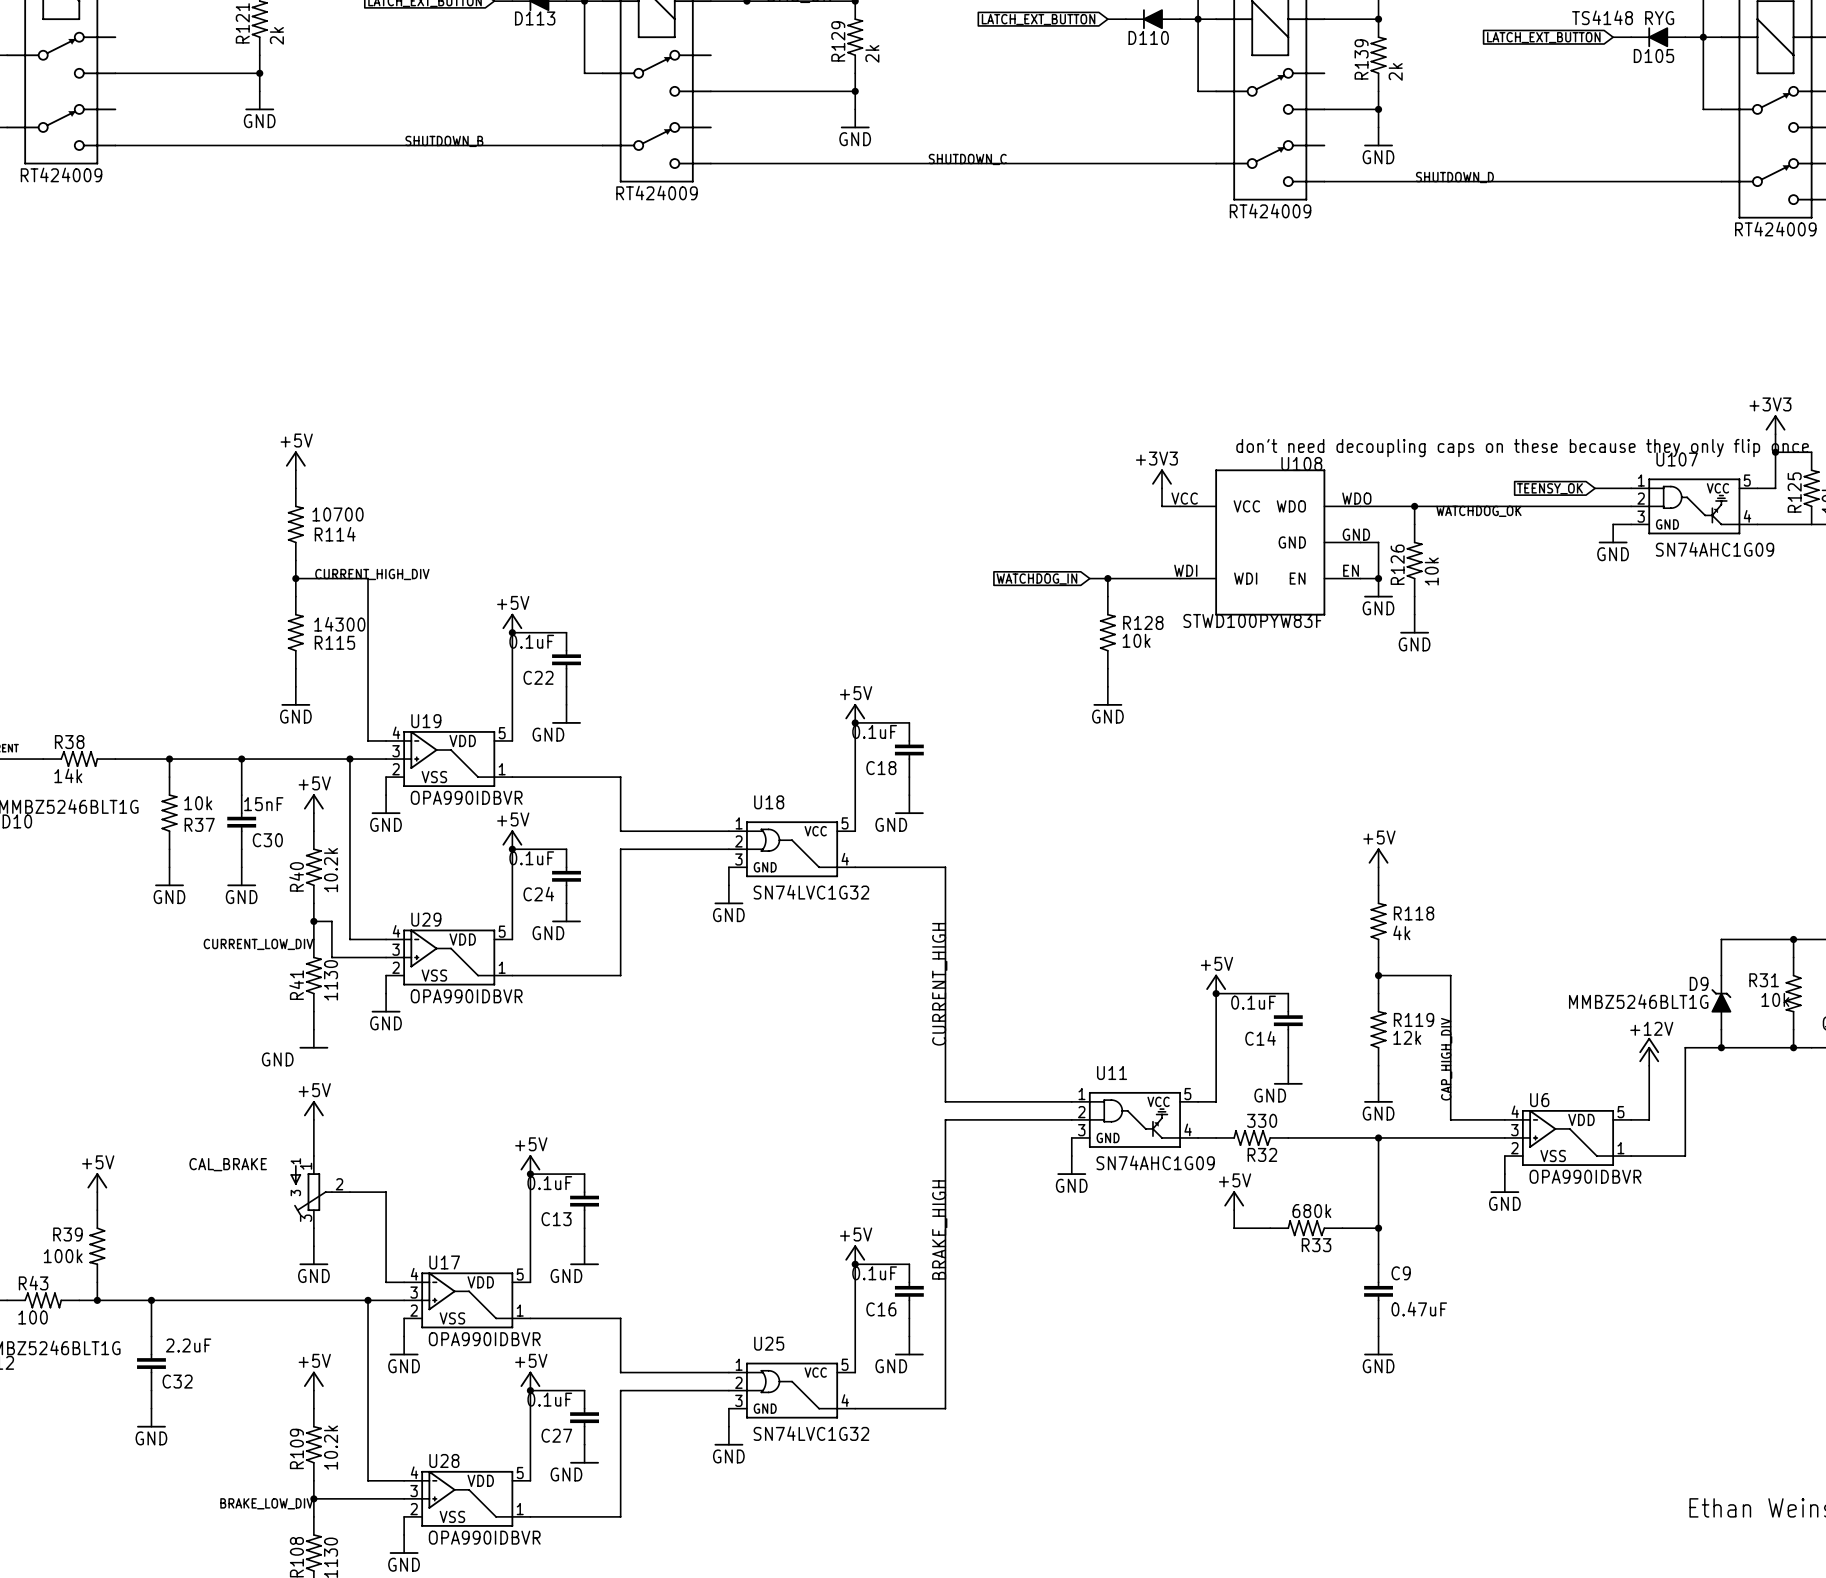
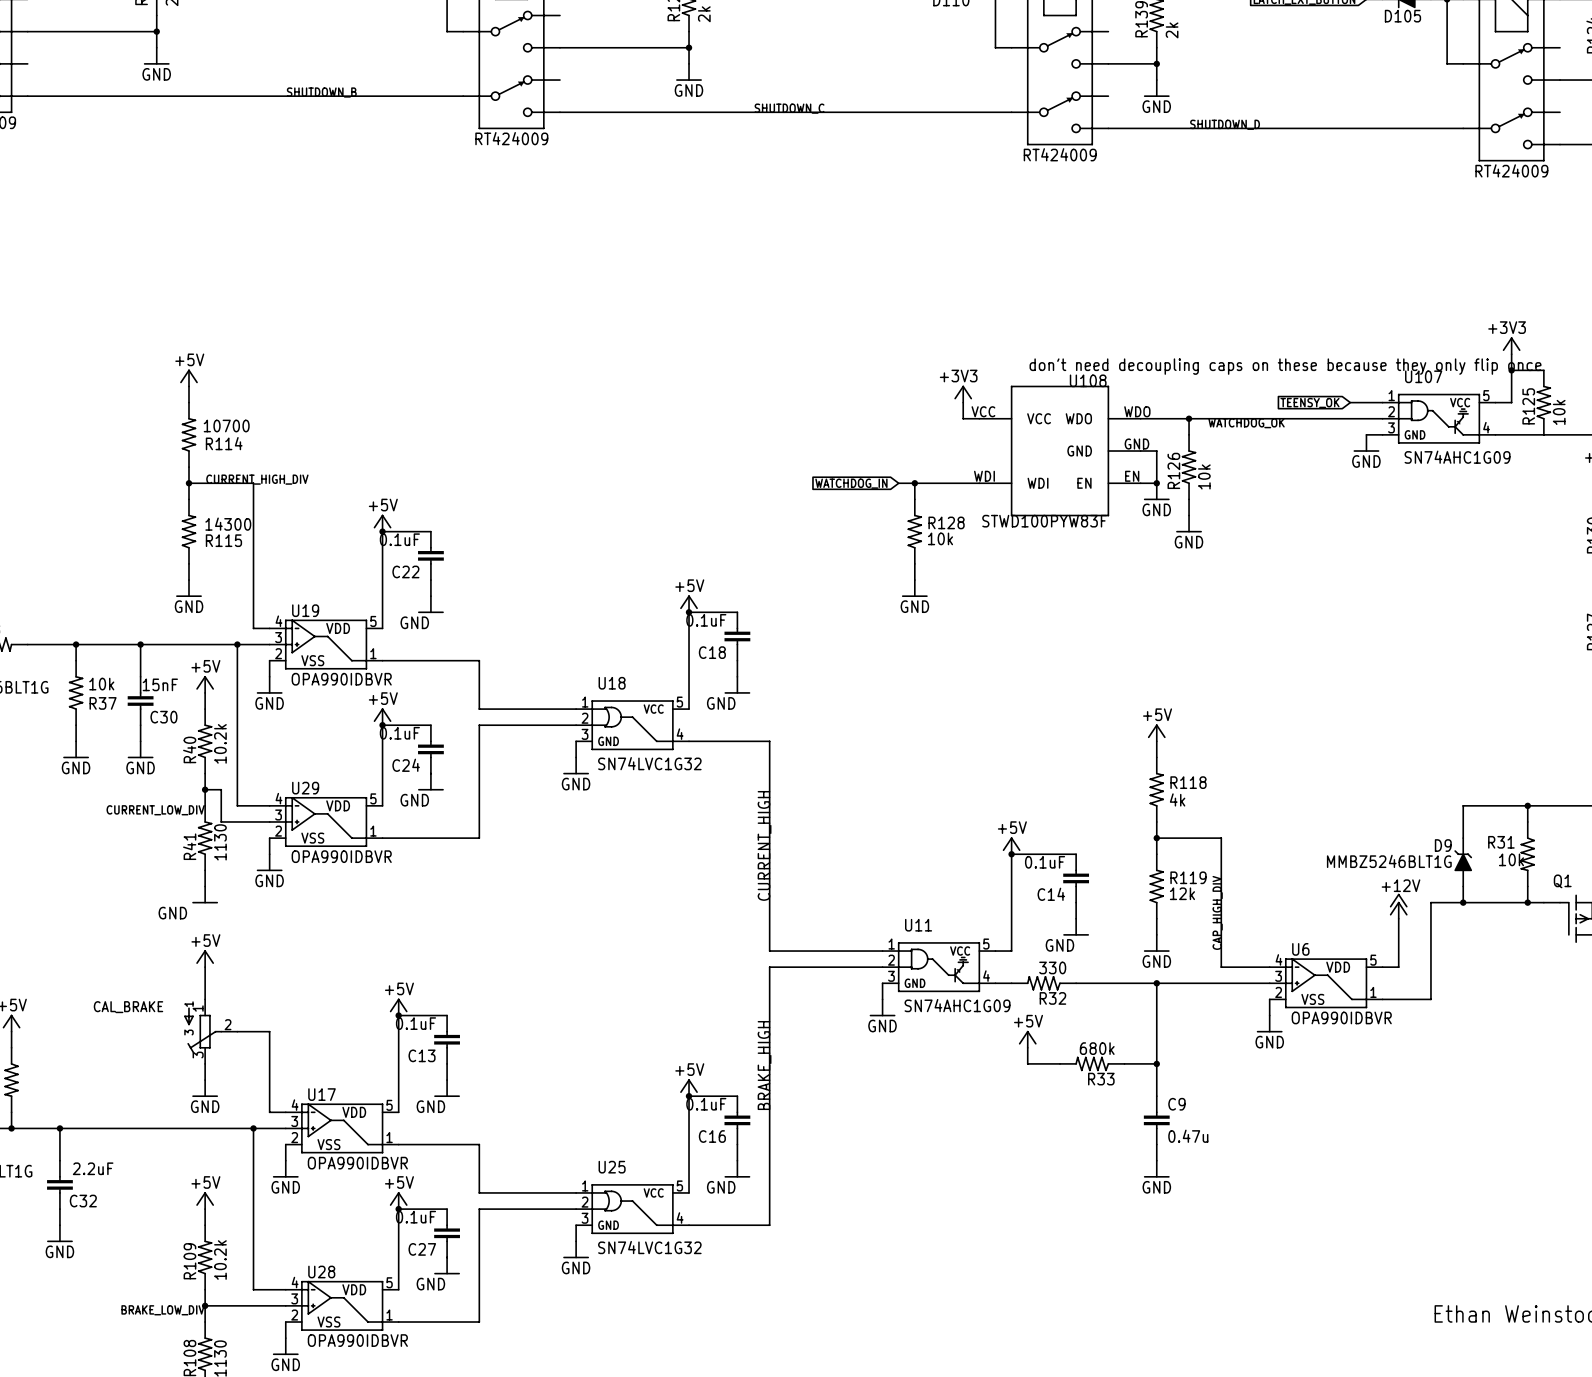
C9 value: 0.47uF (1419, 1309) -> 0.47u (1188, 1136)

